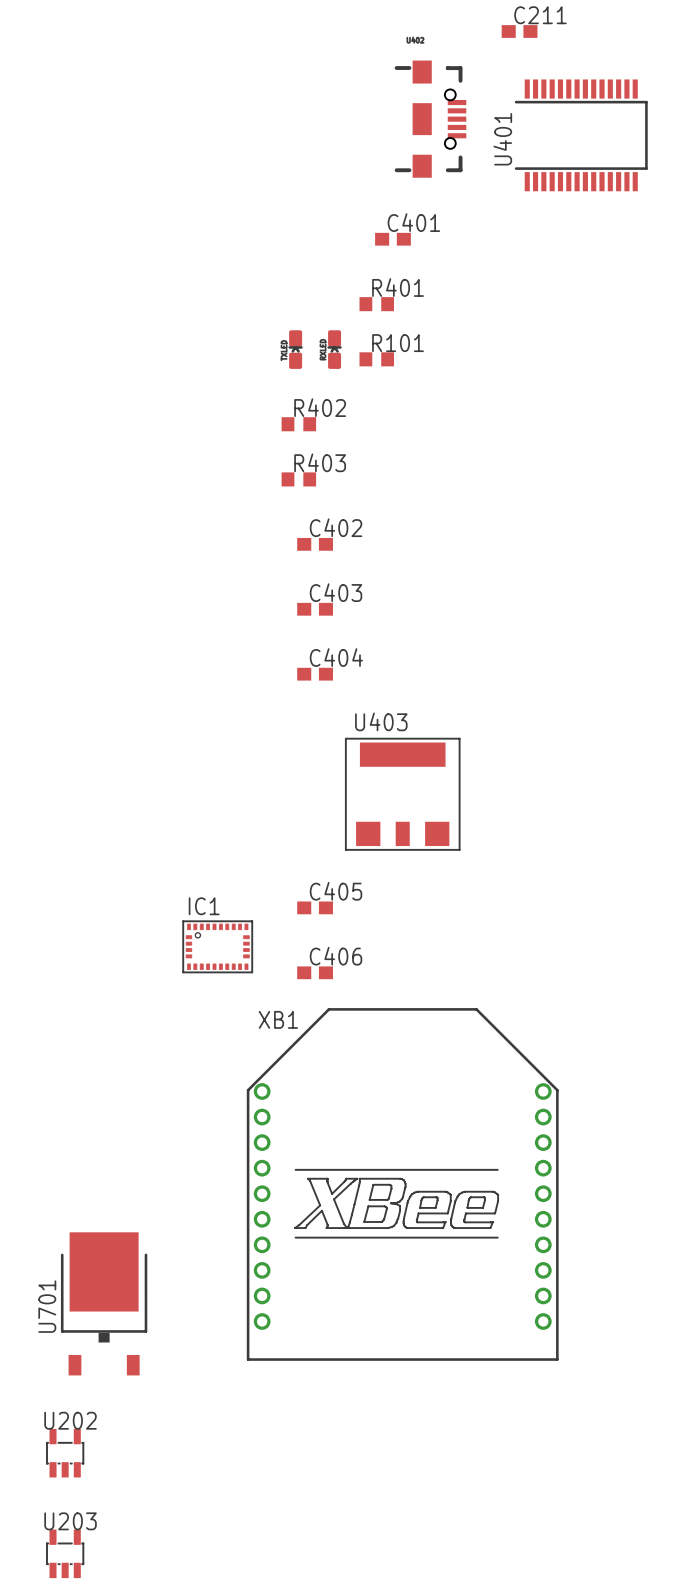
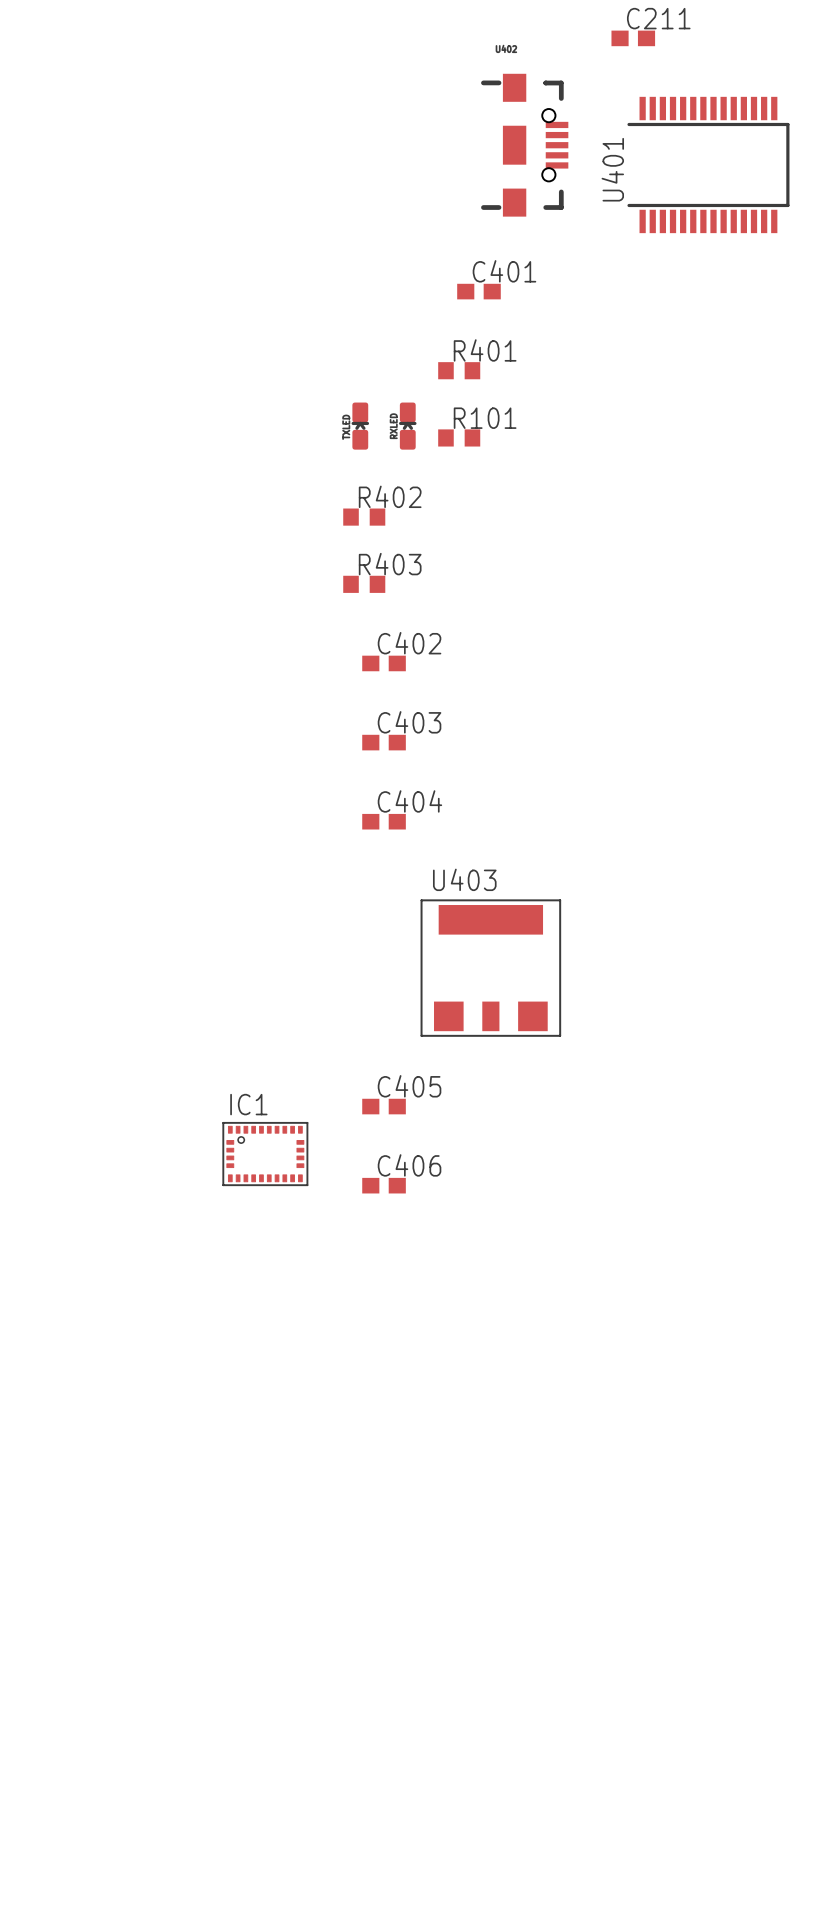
XB1: (402, 1184) -> none
U701: (104, 1303) -> none
U202: (65, 1453) -> none
U203: (65, 1553) -> none

